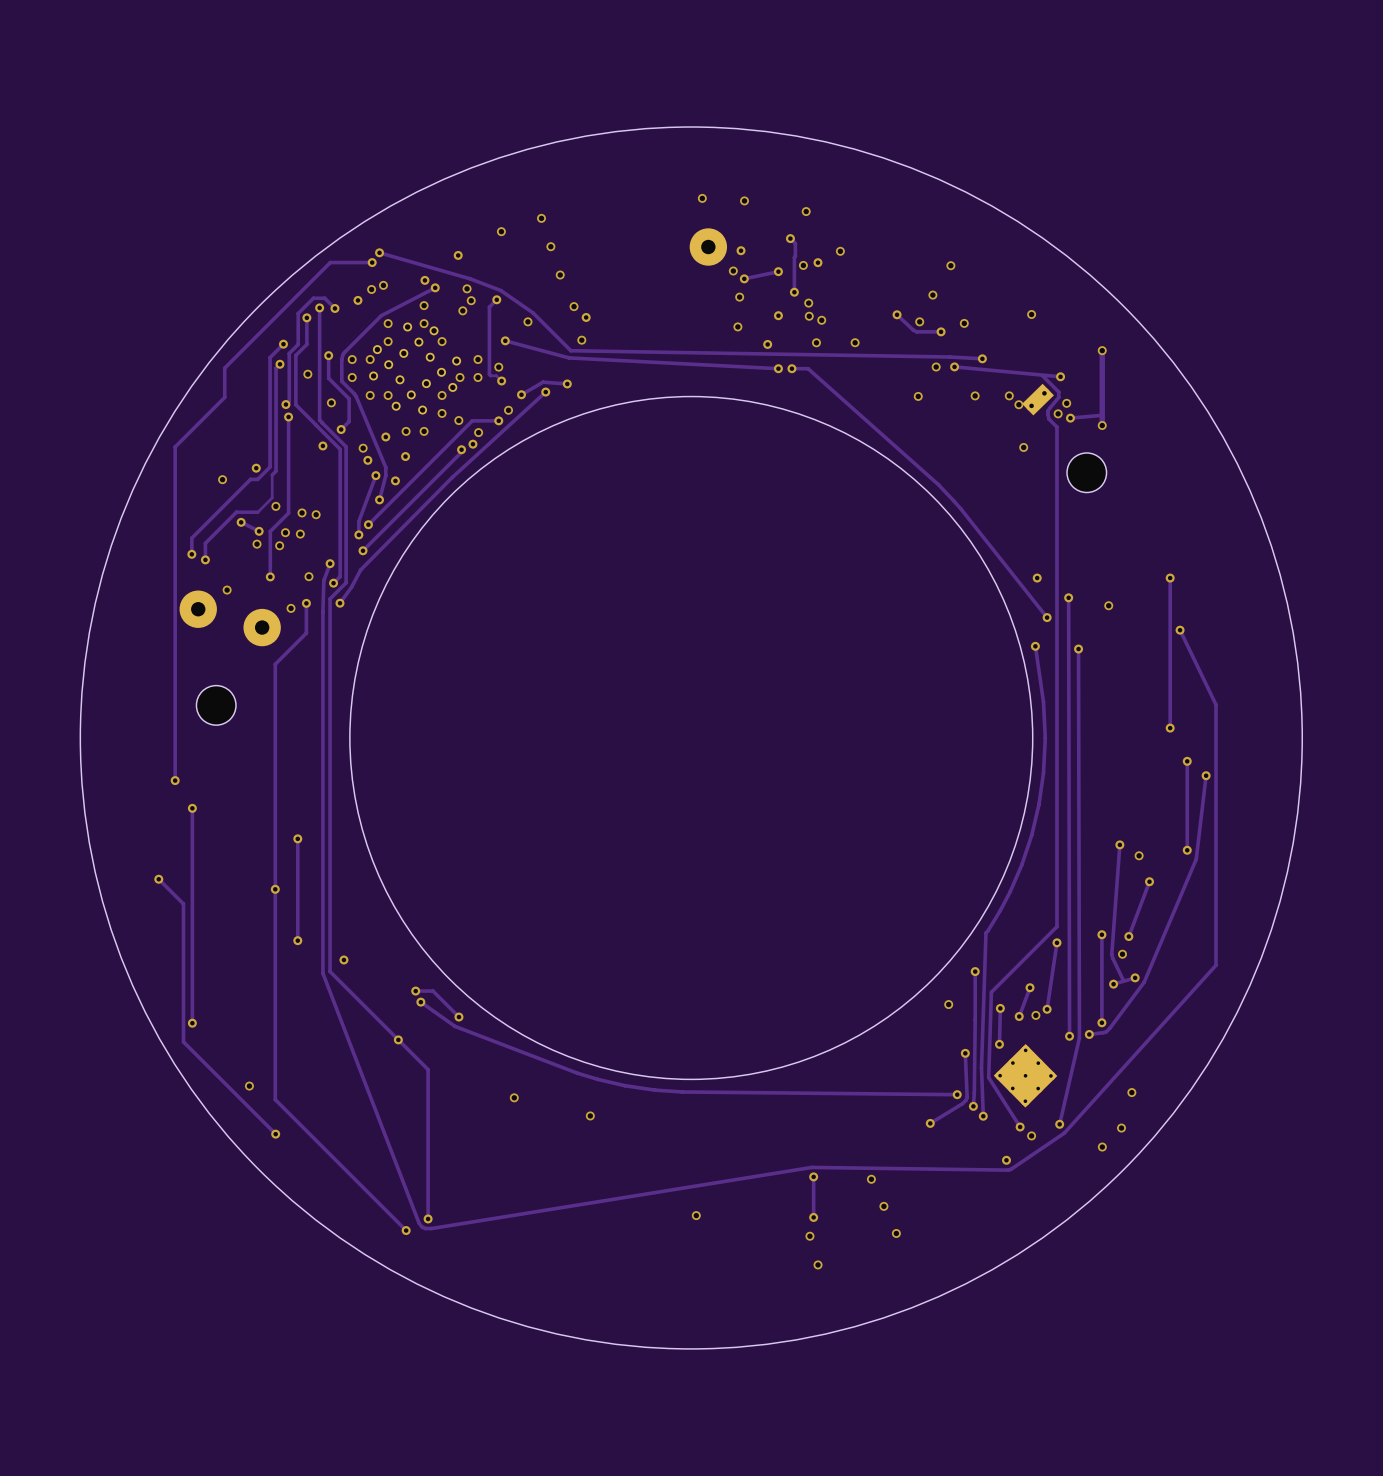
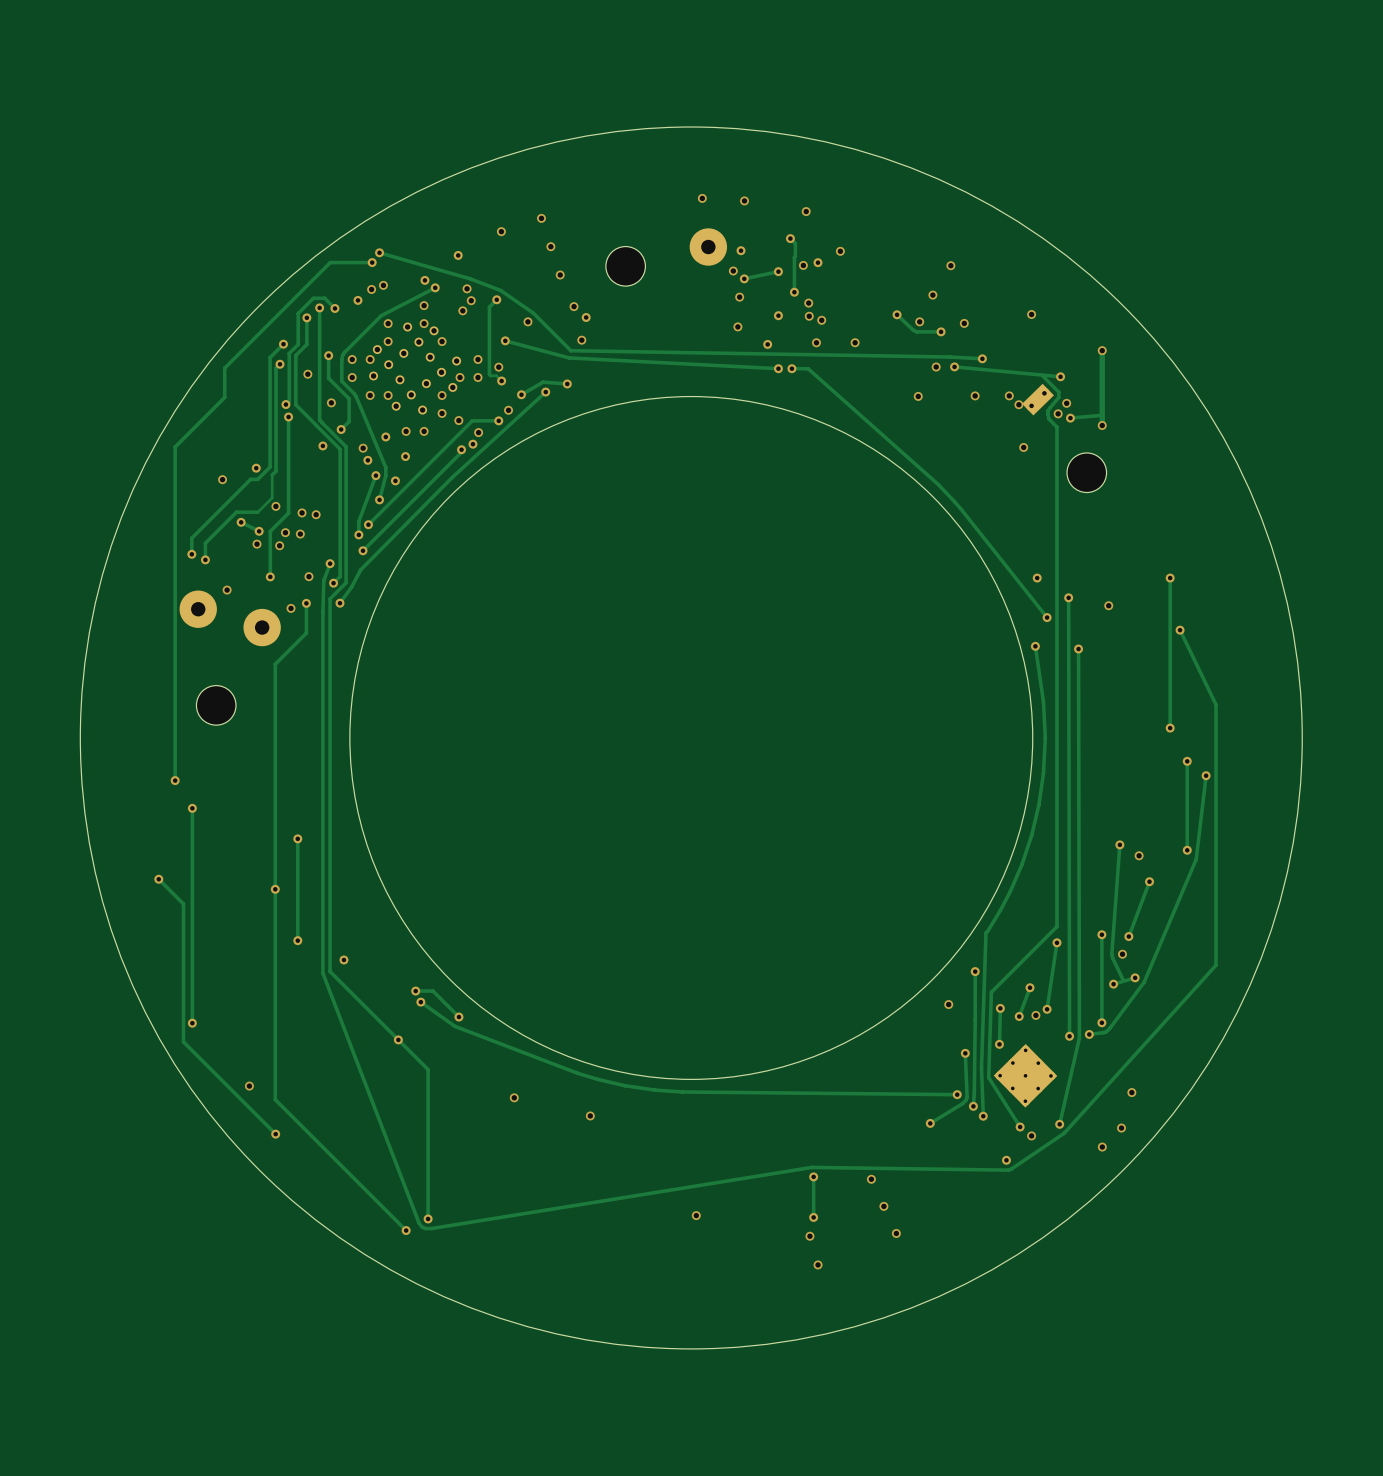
part: none -> (625, 266)

